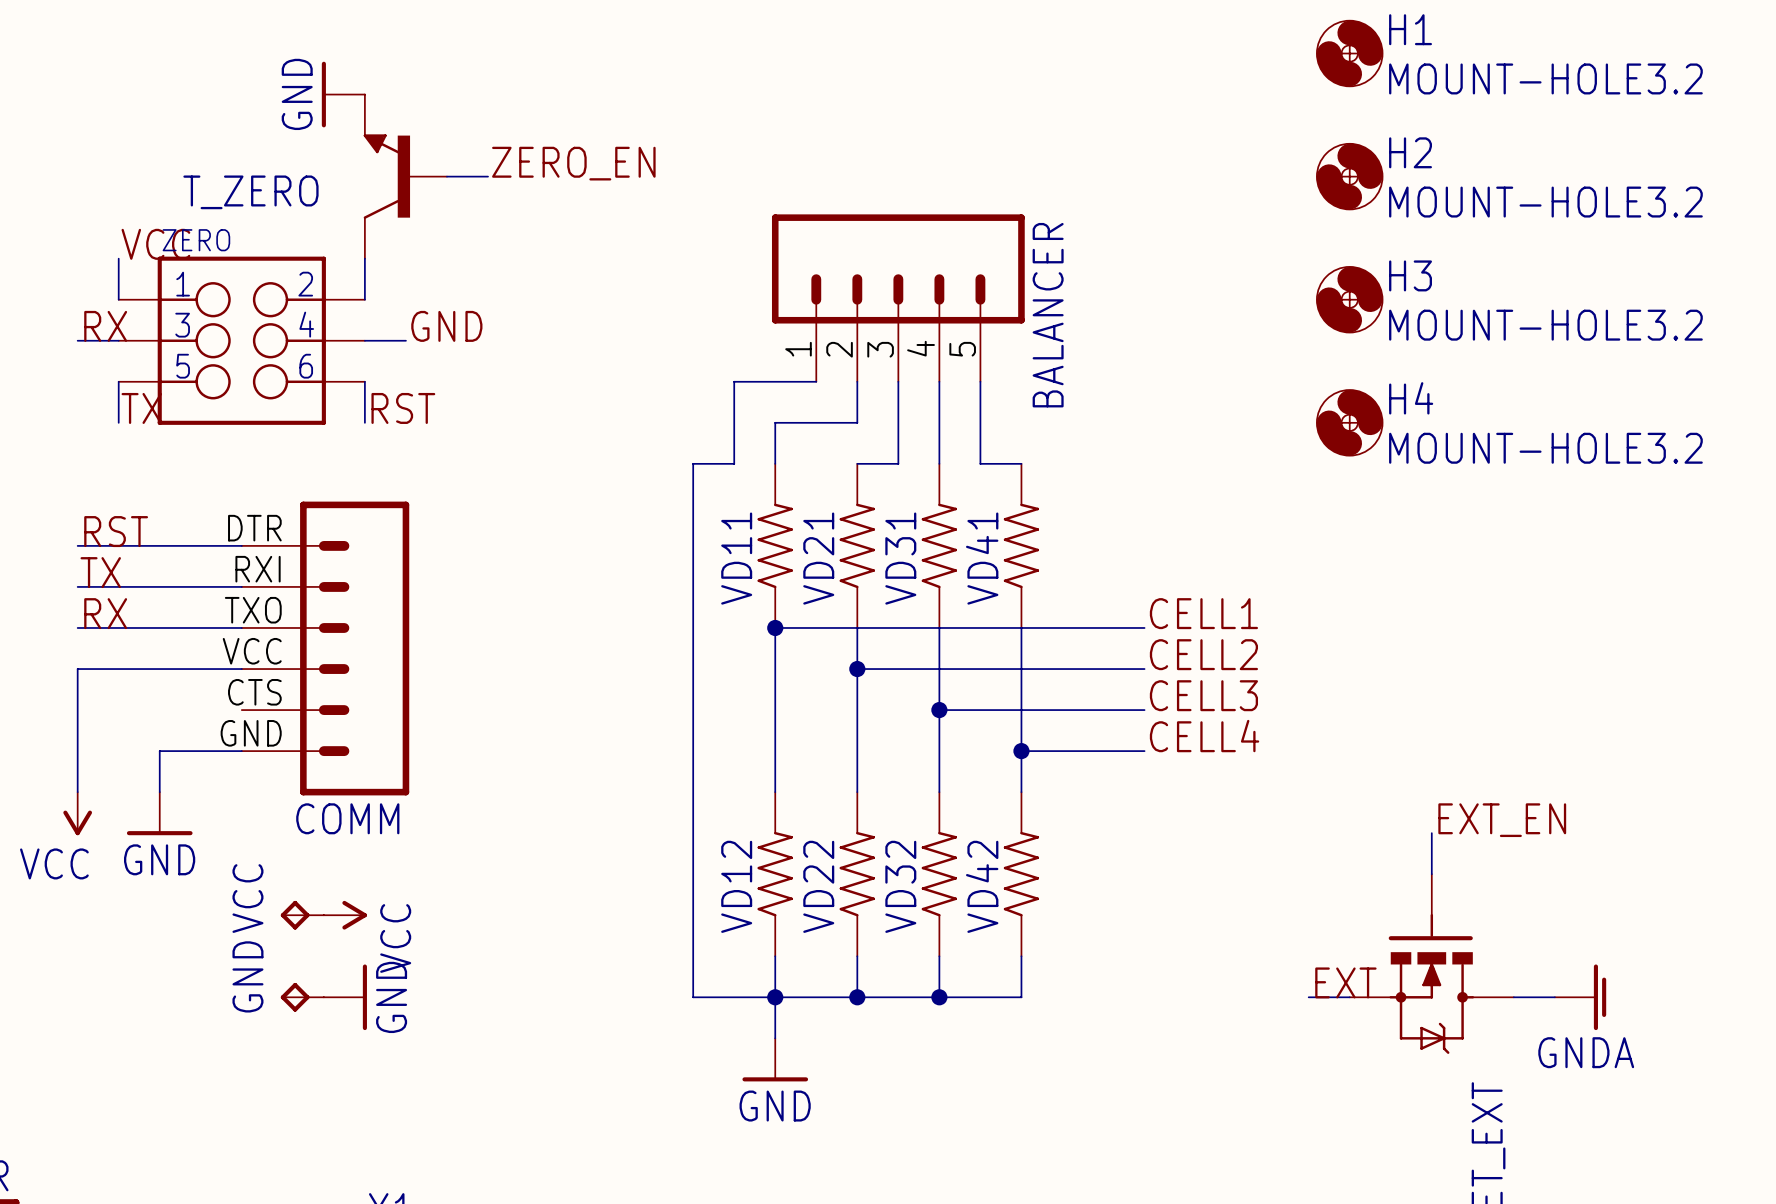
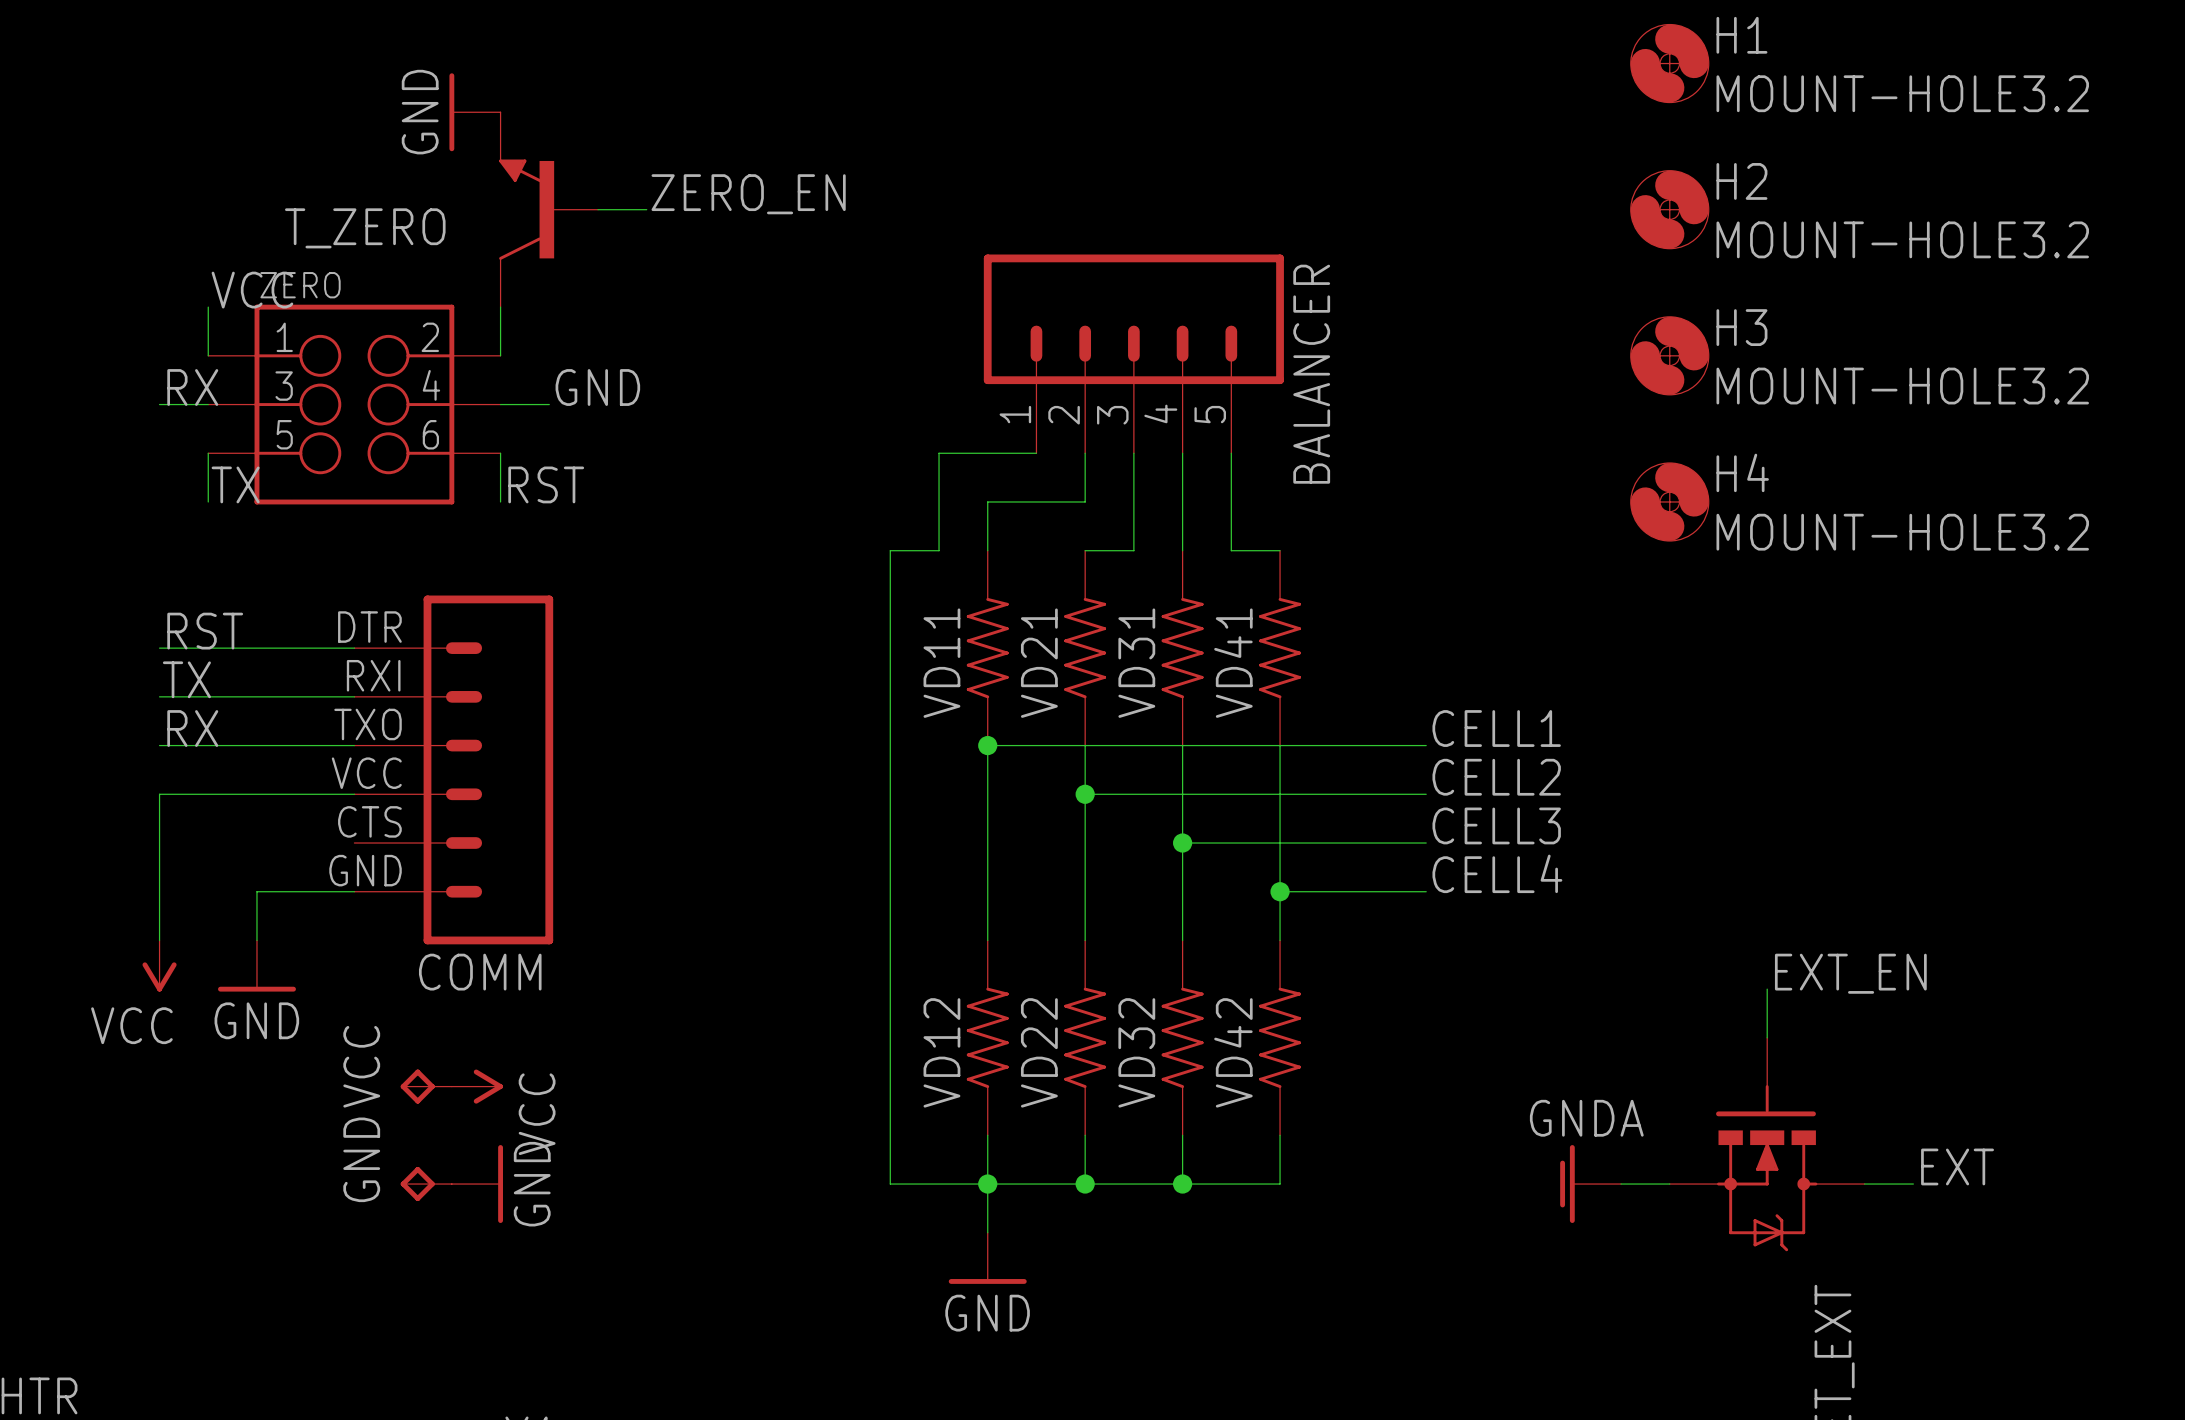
label position: EXT (1345, 982) -> EXT (1957, 1166)
power symbol position: GNDA (1580, 997) -> GNDA (1590, 1184)
power symbol rotation: 0° (1600, 997) -> 180° (1567, 1184)

